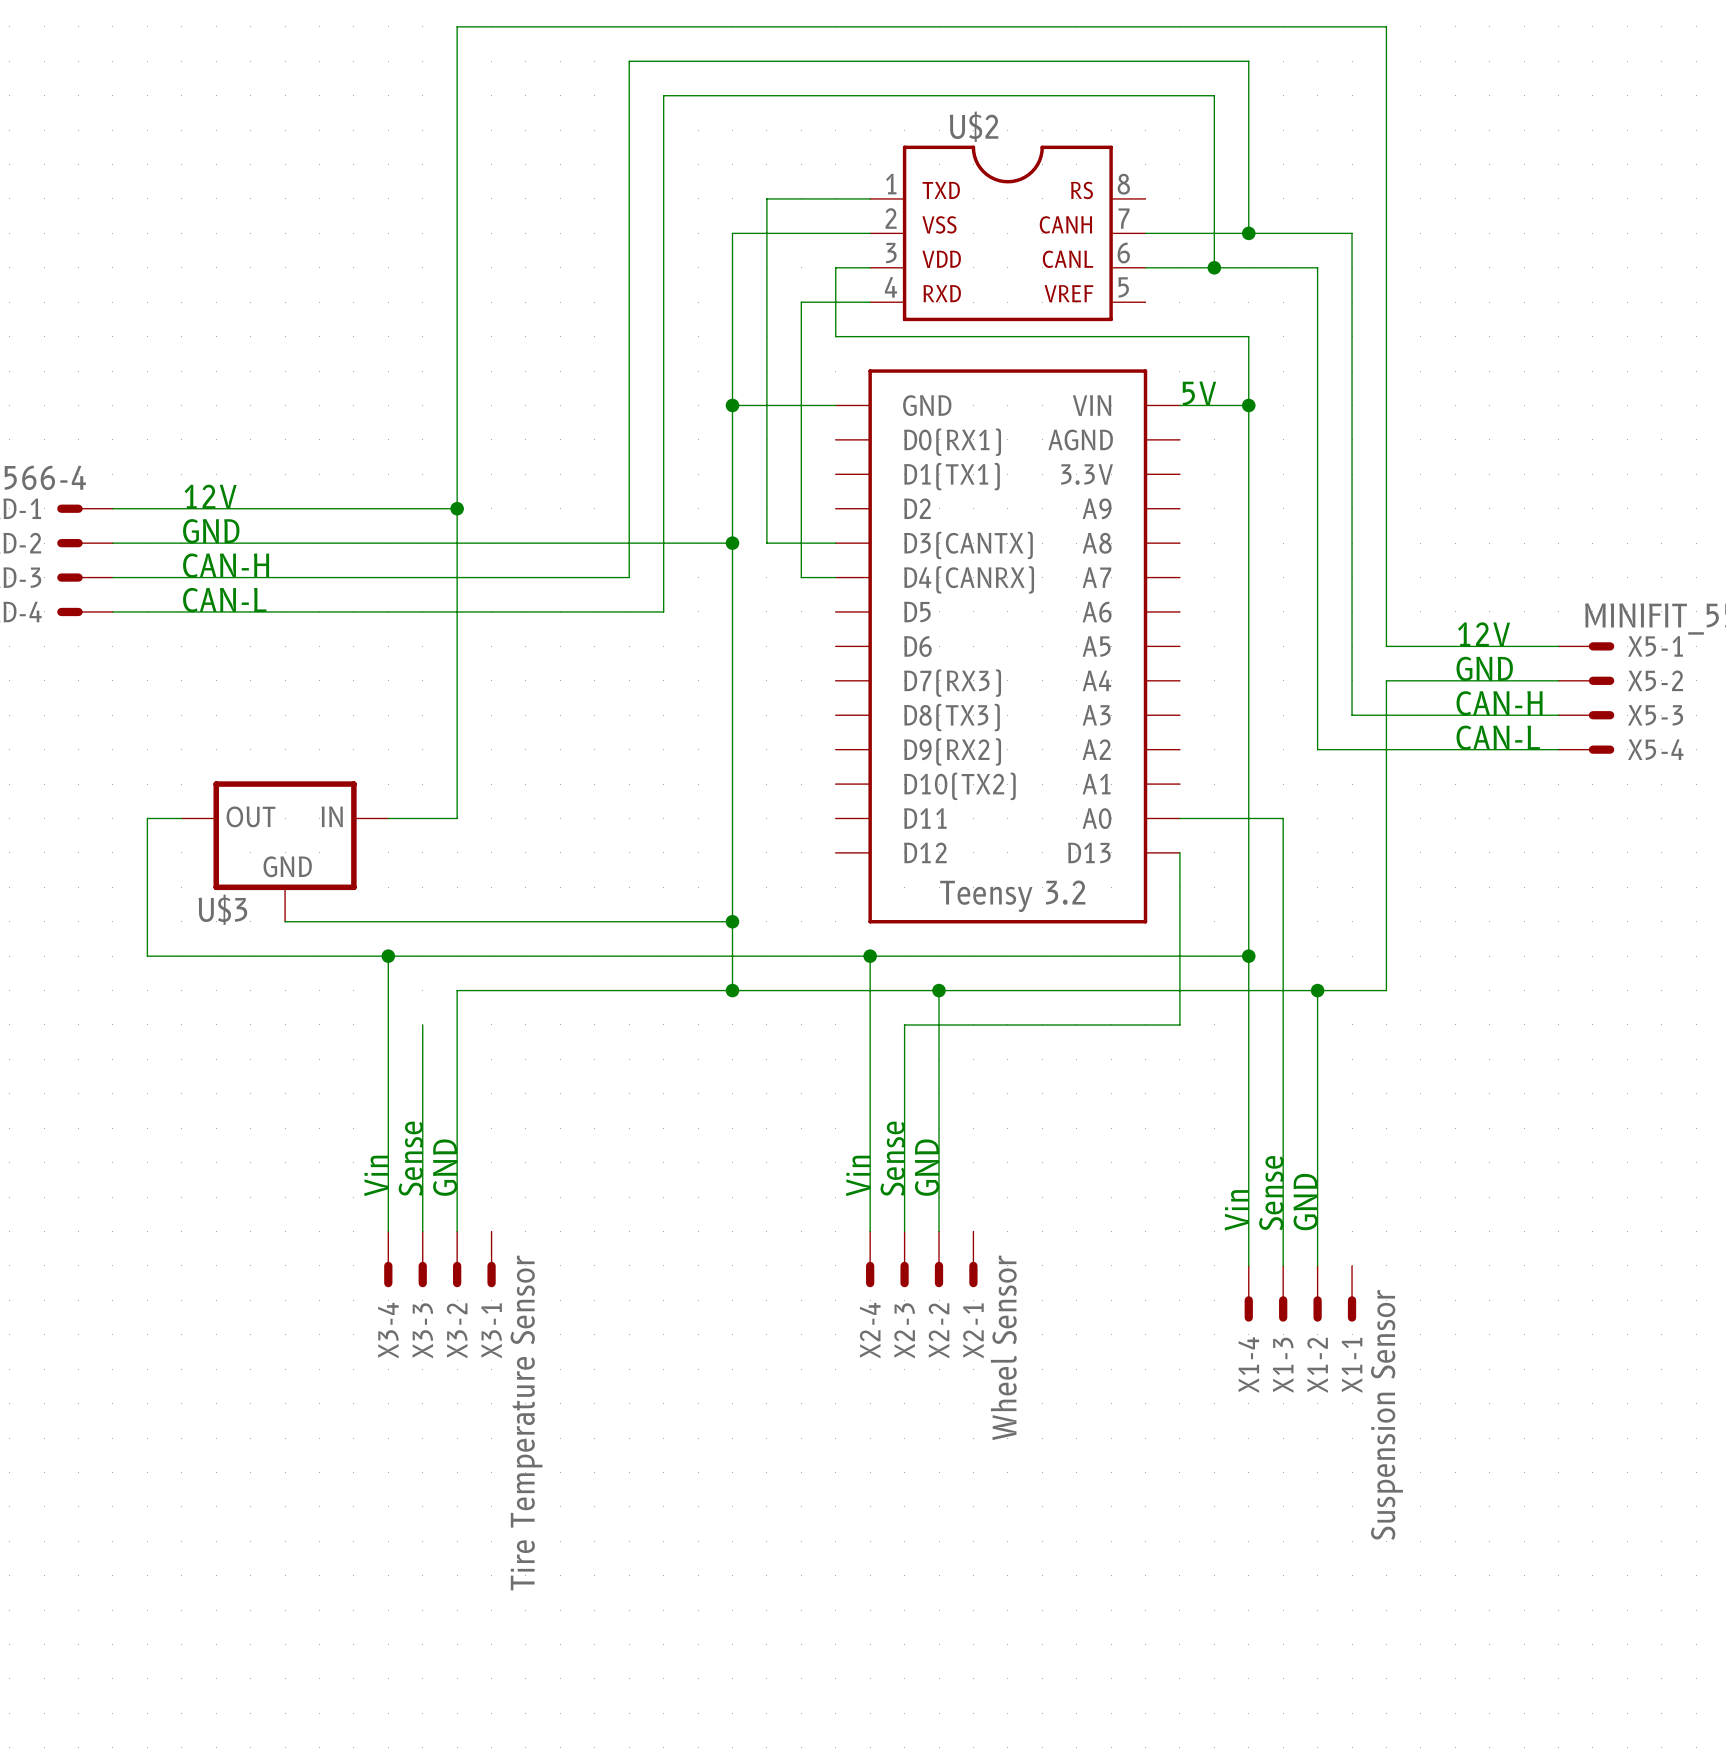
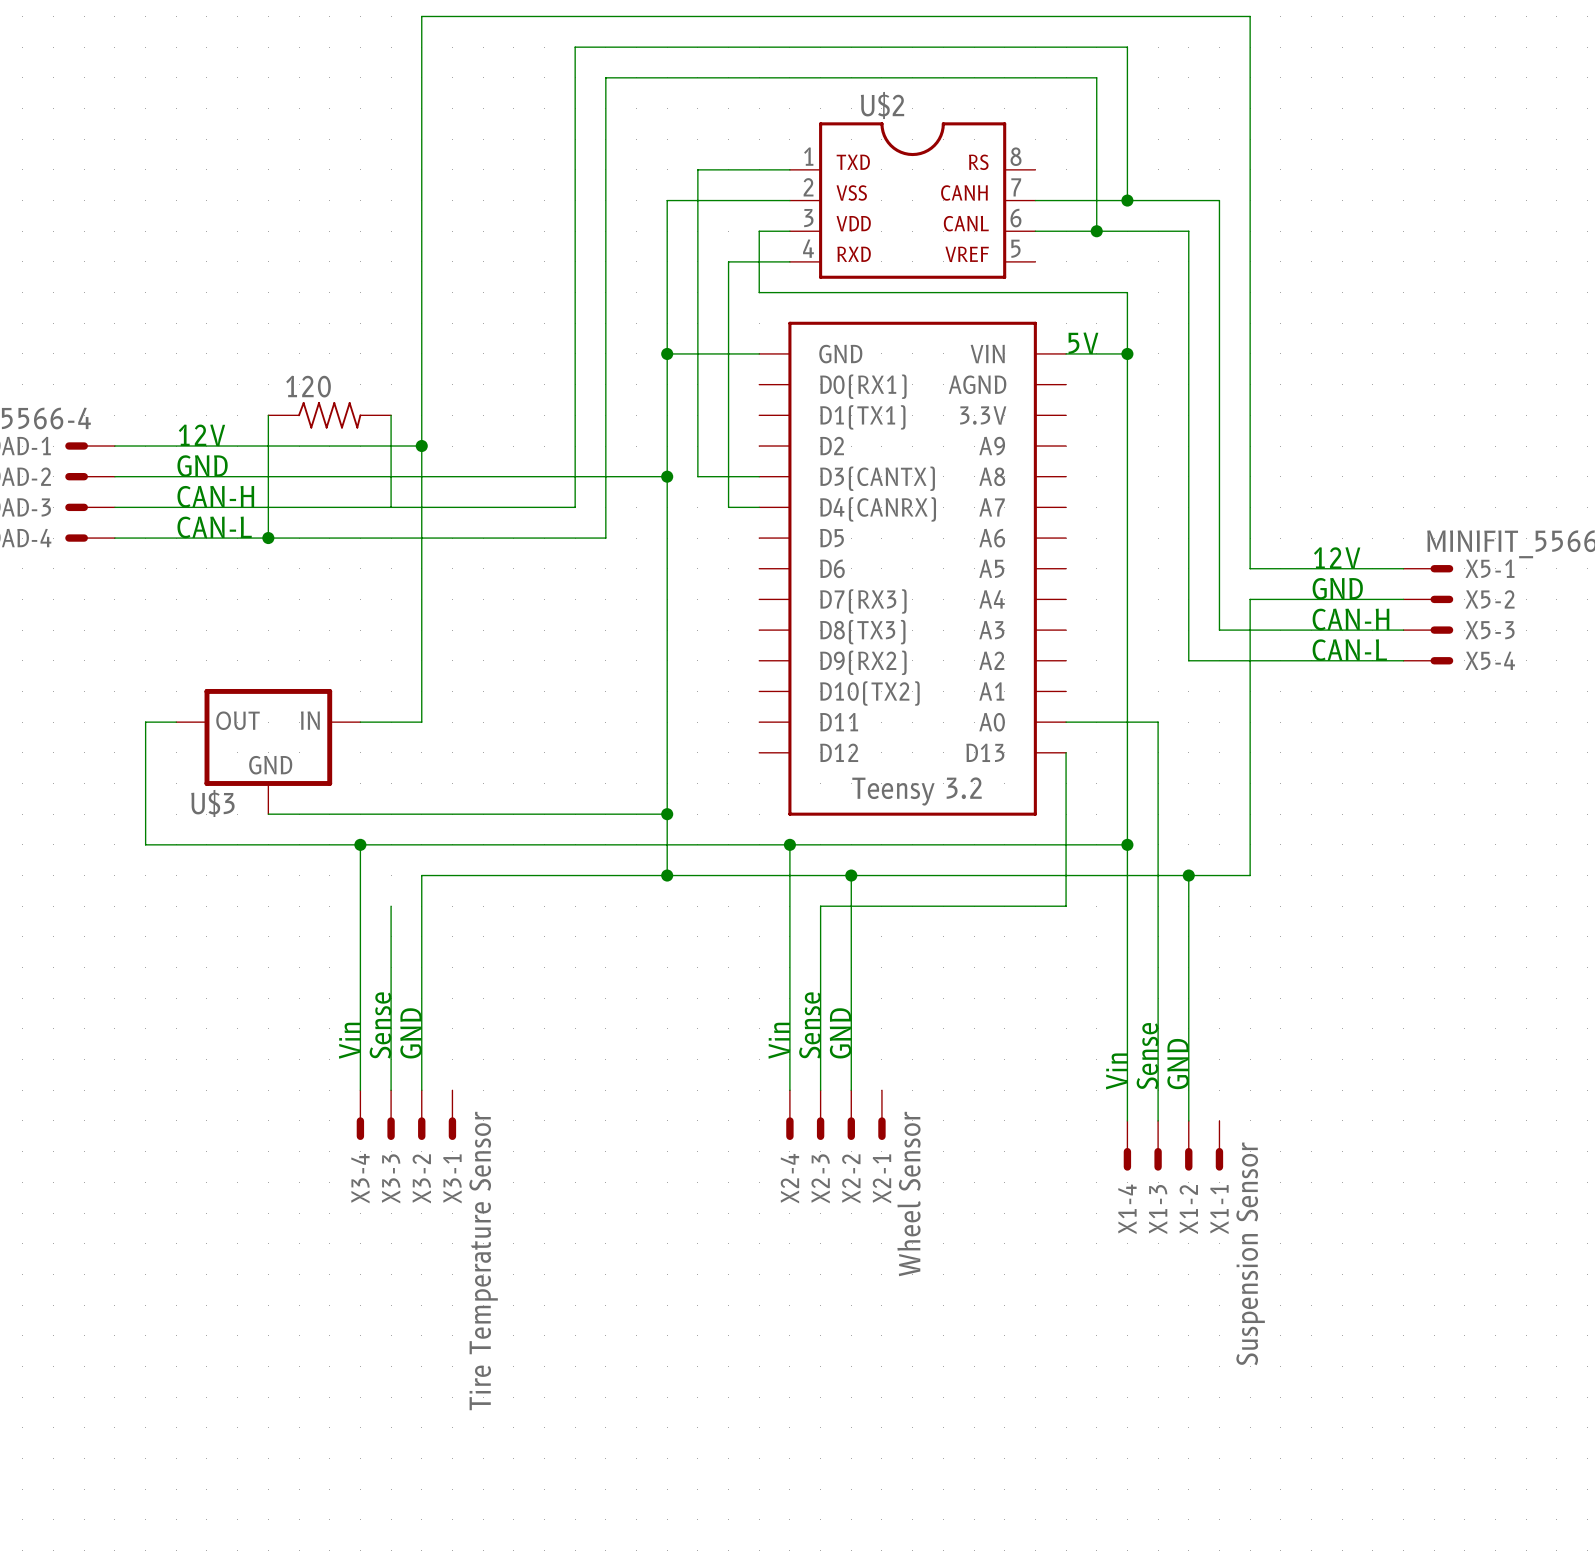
wire: none -> (268, 415) (268, 538)
120: none -> (329, 415)
wire: none -> (391, 415) (391, 507)
junction: none -> (268, 538)

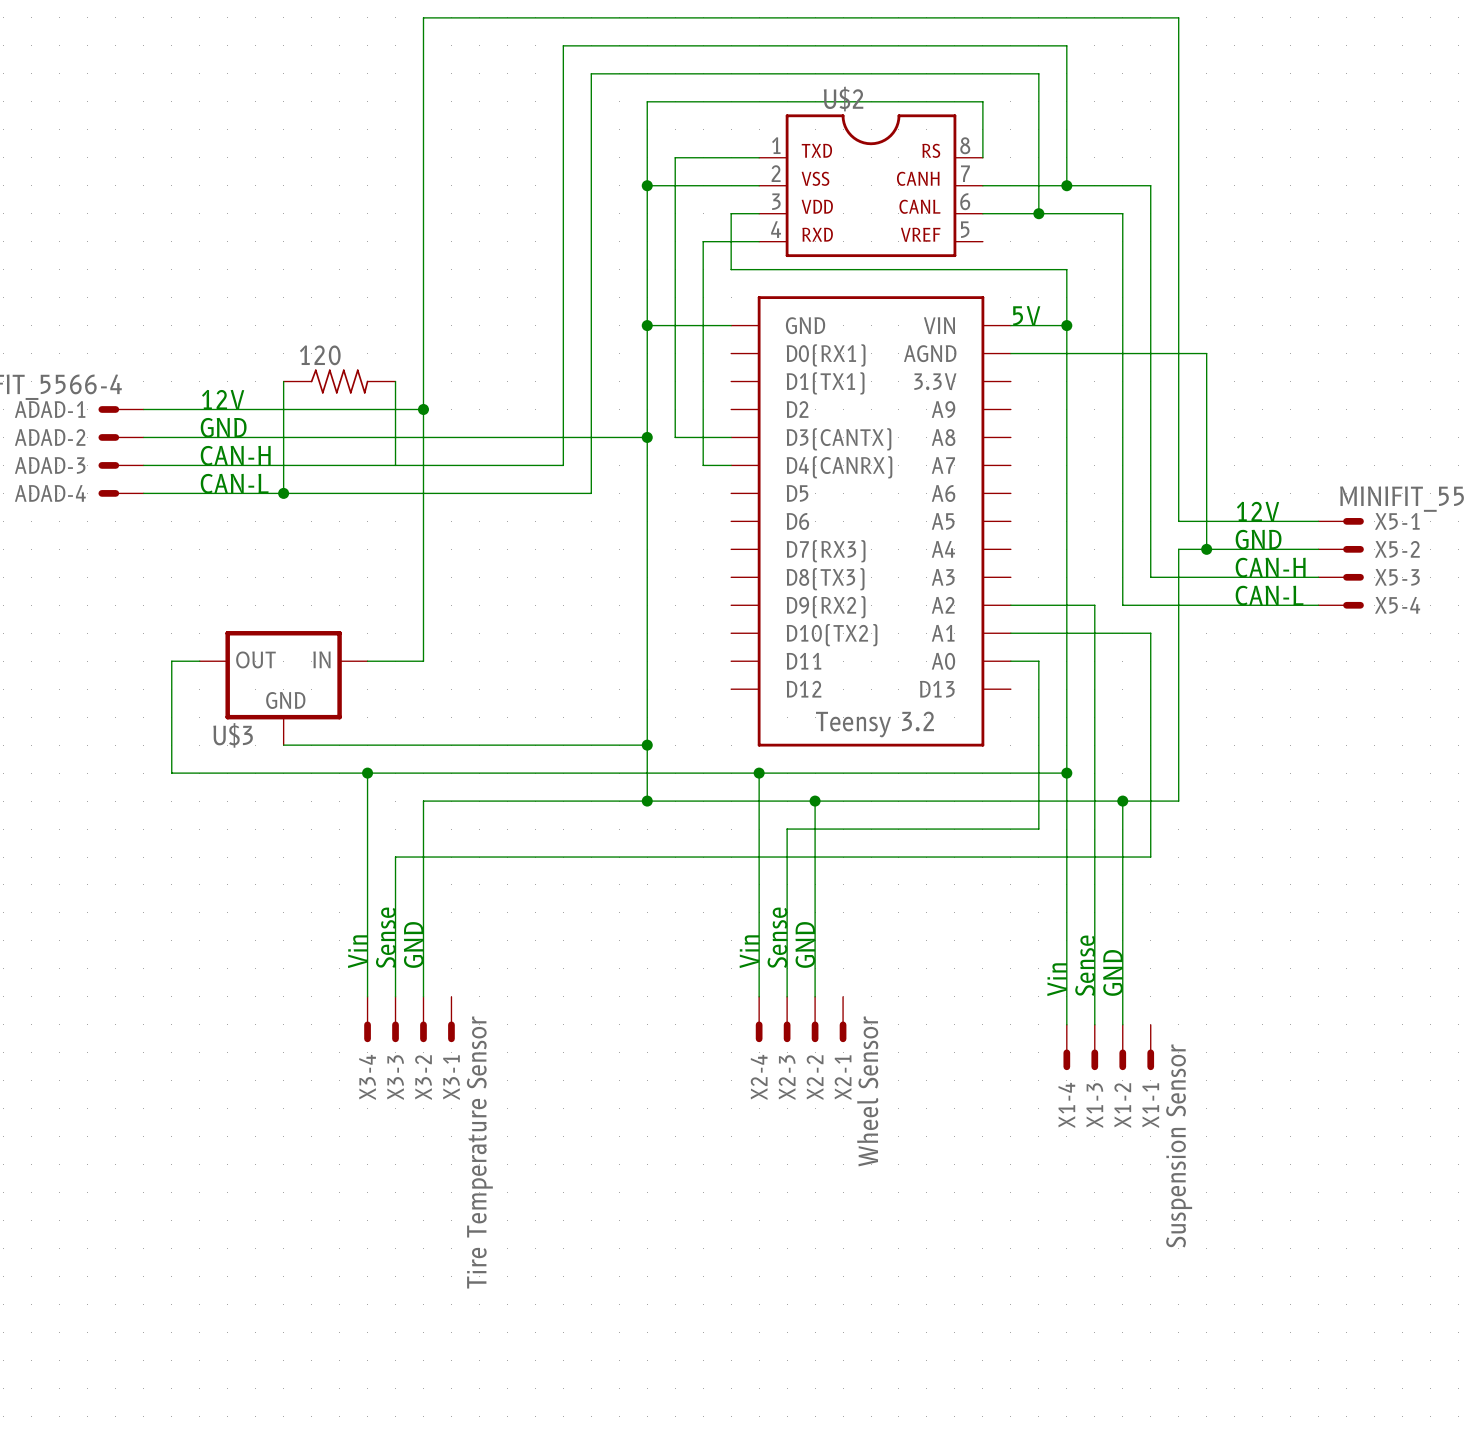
wire: none -> (982, 157) (982, 101) (647, 101) (647, 185)
junction: none -> (647, 185)
wire: none -> (1010, 353) (1206, 353) (1206, 549)
junction: none -> (1206, 549)
wire: (1096, 722) (1158, 722) -> (1010, 605) (1094, 605) (1094, 661)
wire: (1066, 752) (1066, 906) -> (1038, 661) (1038, 829) (1010, 829)
wire: (391, 906) (391, 936) -> (1010, 633) (1150, 633) (1150, 857) (395, 857)

